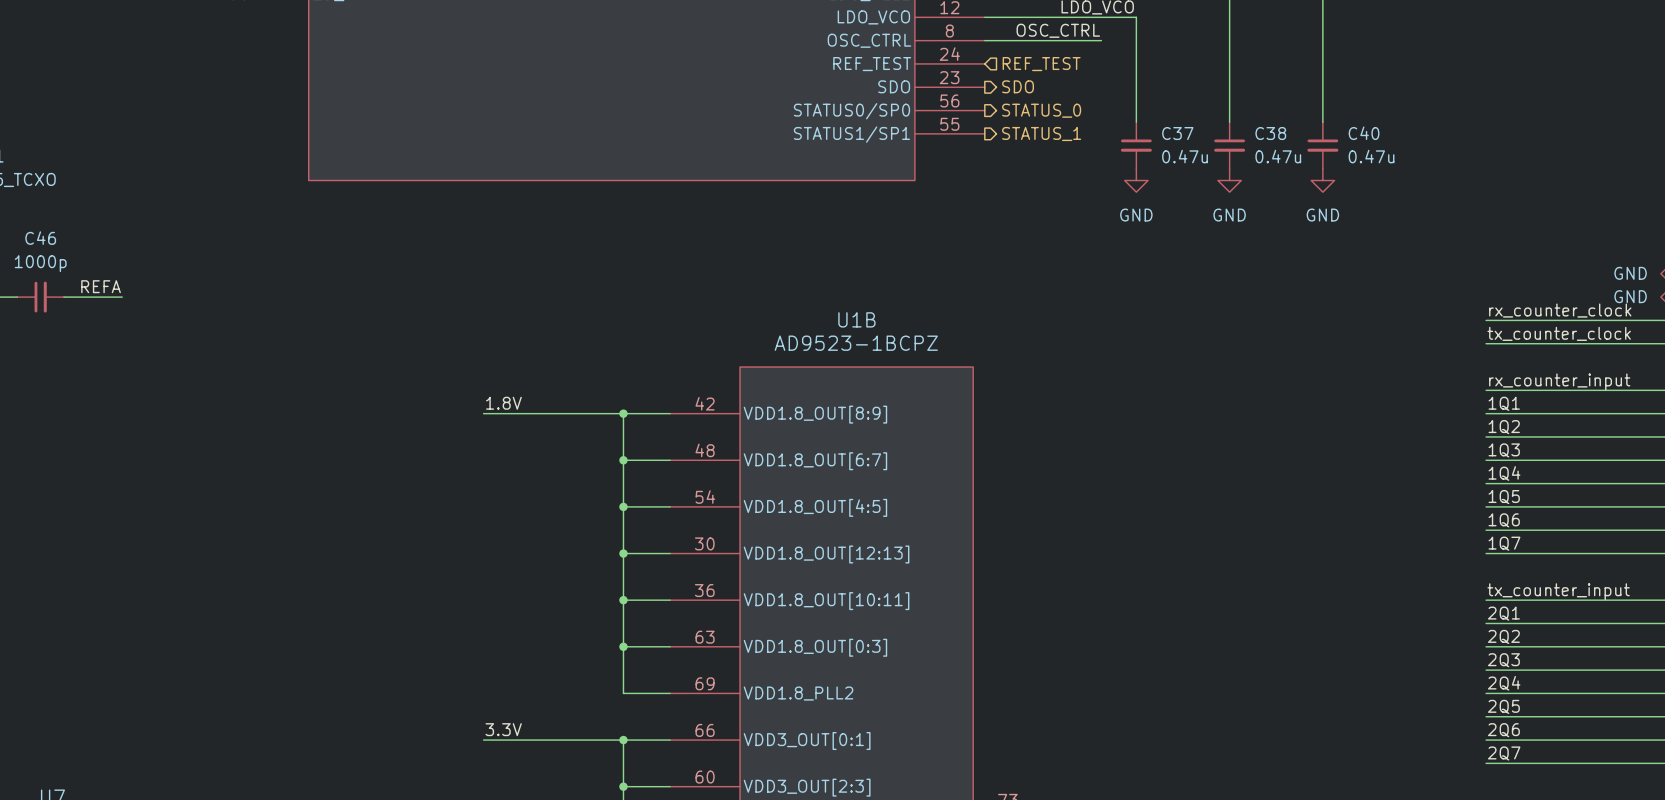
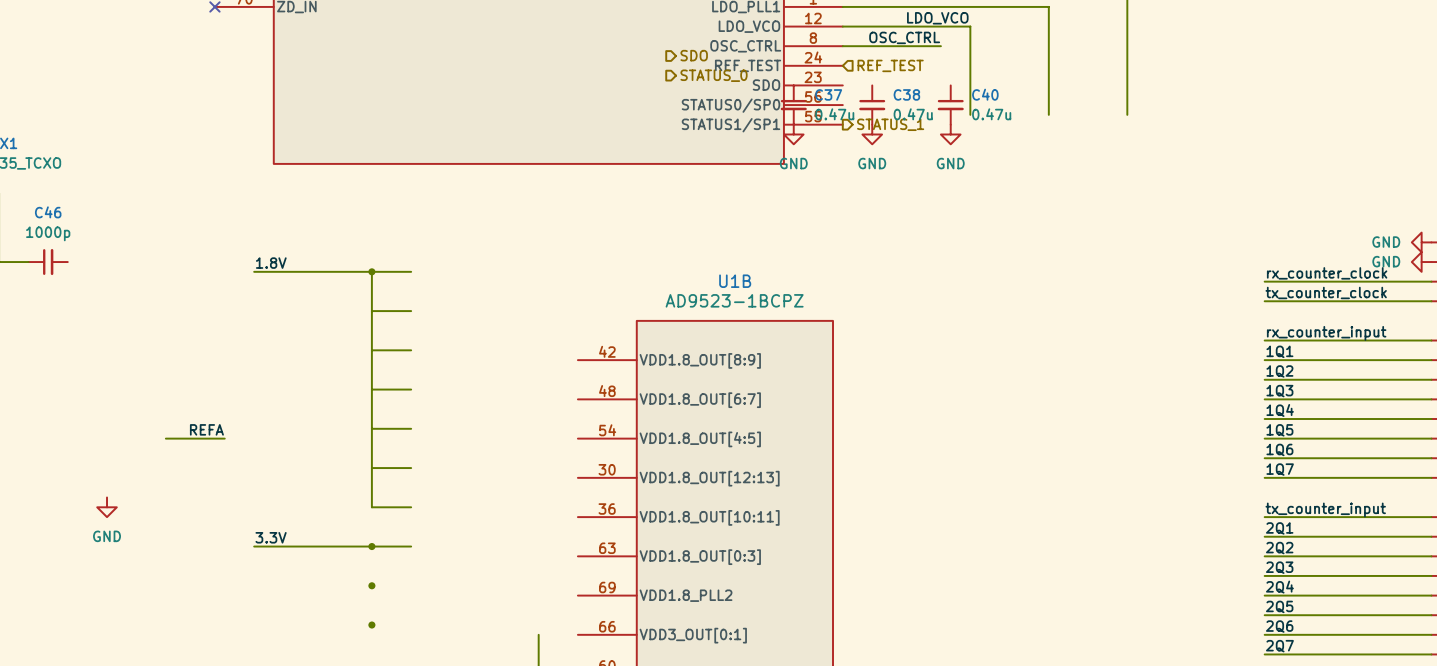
hierarchical label position: SDO (1018, 86) -> SDO (694, 55)
hierarchical label position: STATUS_0 (1041, 110) -> STATUS_0 (714, 75)
power symbol: none -> GND (793, 134)
power symbol: none -> GND (872, 134)
C37 position: (1136, 145) -> (793, 105)
C38 position: (1229, 145) -> (872, 105)
C40 position: (1322, 145) -> (950, 105)
power symbol position: GND (1136, 180) -> GND (950, 134)
power symbol: GND (1229, 180) -> none
power symbol: GND (1322, 180) -> none
label: REFA (101, 286) -> none
wire: (63, 297) (122, 297) -> none
junction: none -> (371, 271)
label position: 1.8V (503, 403) -> 1.8V (271, 263)
wire: (483, 413) (670, 413) -> (254, 271) (411, 271)
wire: (623, 413) (623, 693) (670, 693) -> (371, 271) (371, 507) (411, 507)
junction: (623, 413) -> none
wire: (623, 460) (670, 460) -> (371, 311) (411, 311)
junction: (623, 460) -> none
label: none -> REFA (206, 429)
wire: none -> (165, 438) (224, 438)
wire: (623, 506) (670, 506) -> (371, 350) (411, 350)
junction: (623, 506) -> none
wire: (623, 553) (670, 553) -> (371, 389) (411, 389)
junction: (623, 553) -> none
power symbol: none -> GND (107, 507)
wire: (623, 600) (670, 600) -> (371, 428) (411, 428)
junction: (623, 600) -> none
junction: none -> (371, 546)
wire: (623, 646) (670, 646) -> (371, 468) (411, 468)
junction: (623, 646) -> none
junction: none -> (371, 585)
junction: none -> (371, 625)
label position: 3.3V (503, 729) -> 3.3V (271, 537)
wire: (483, 740) (670, 740) -> (254, 546) (411, 546)
junction: (623, 740) -> none

